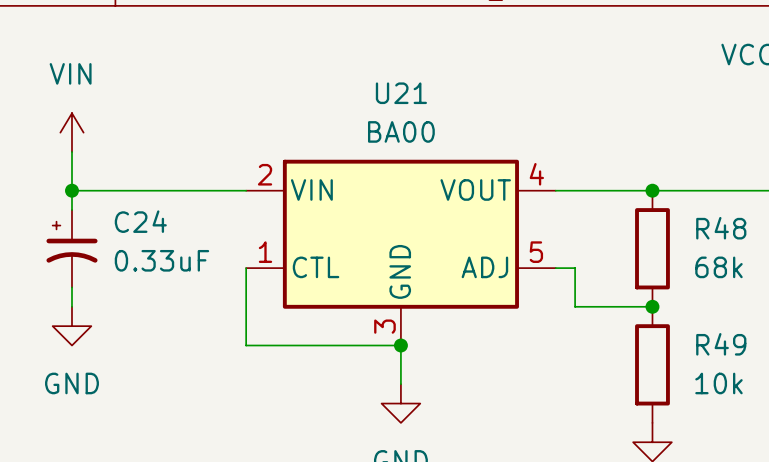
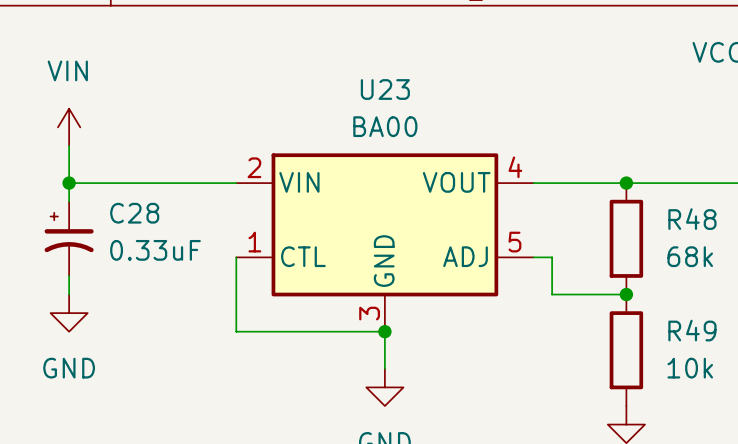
U21 name: U21 (401, 93) -> U23 (385, 89)
C24 name: C24 (140, 221) -> C28 (134, 213)

